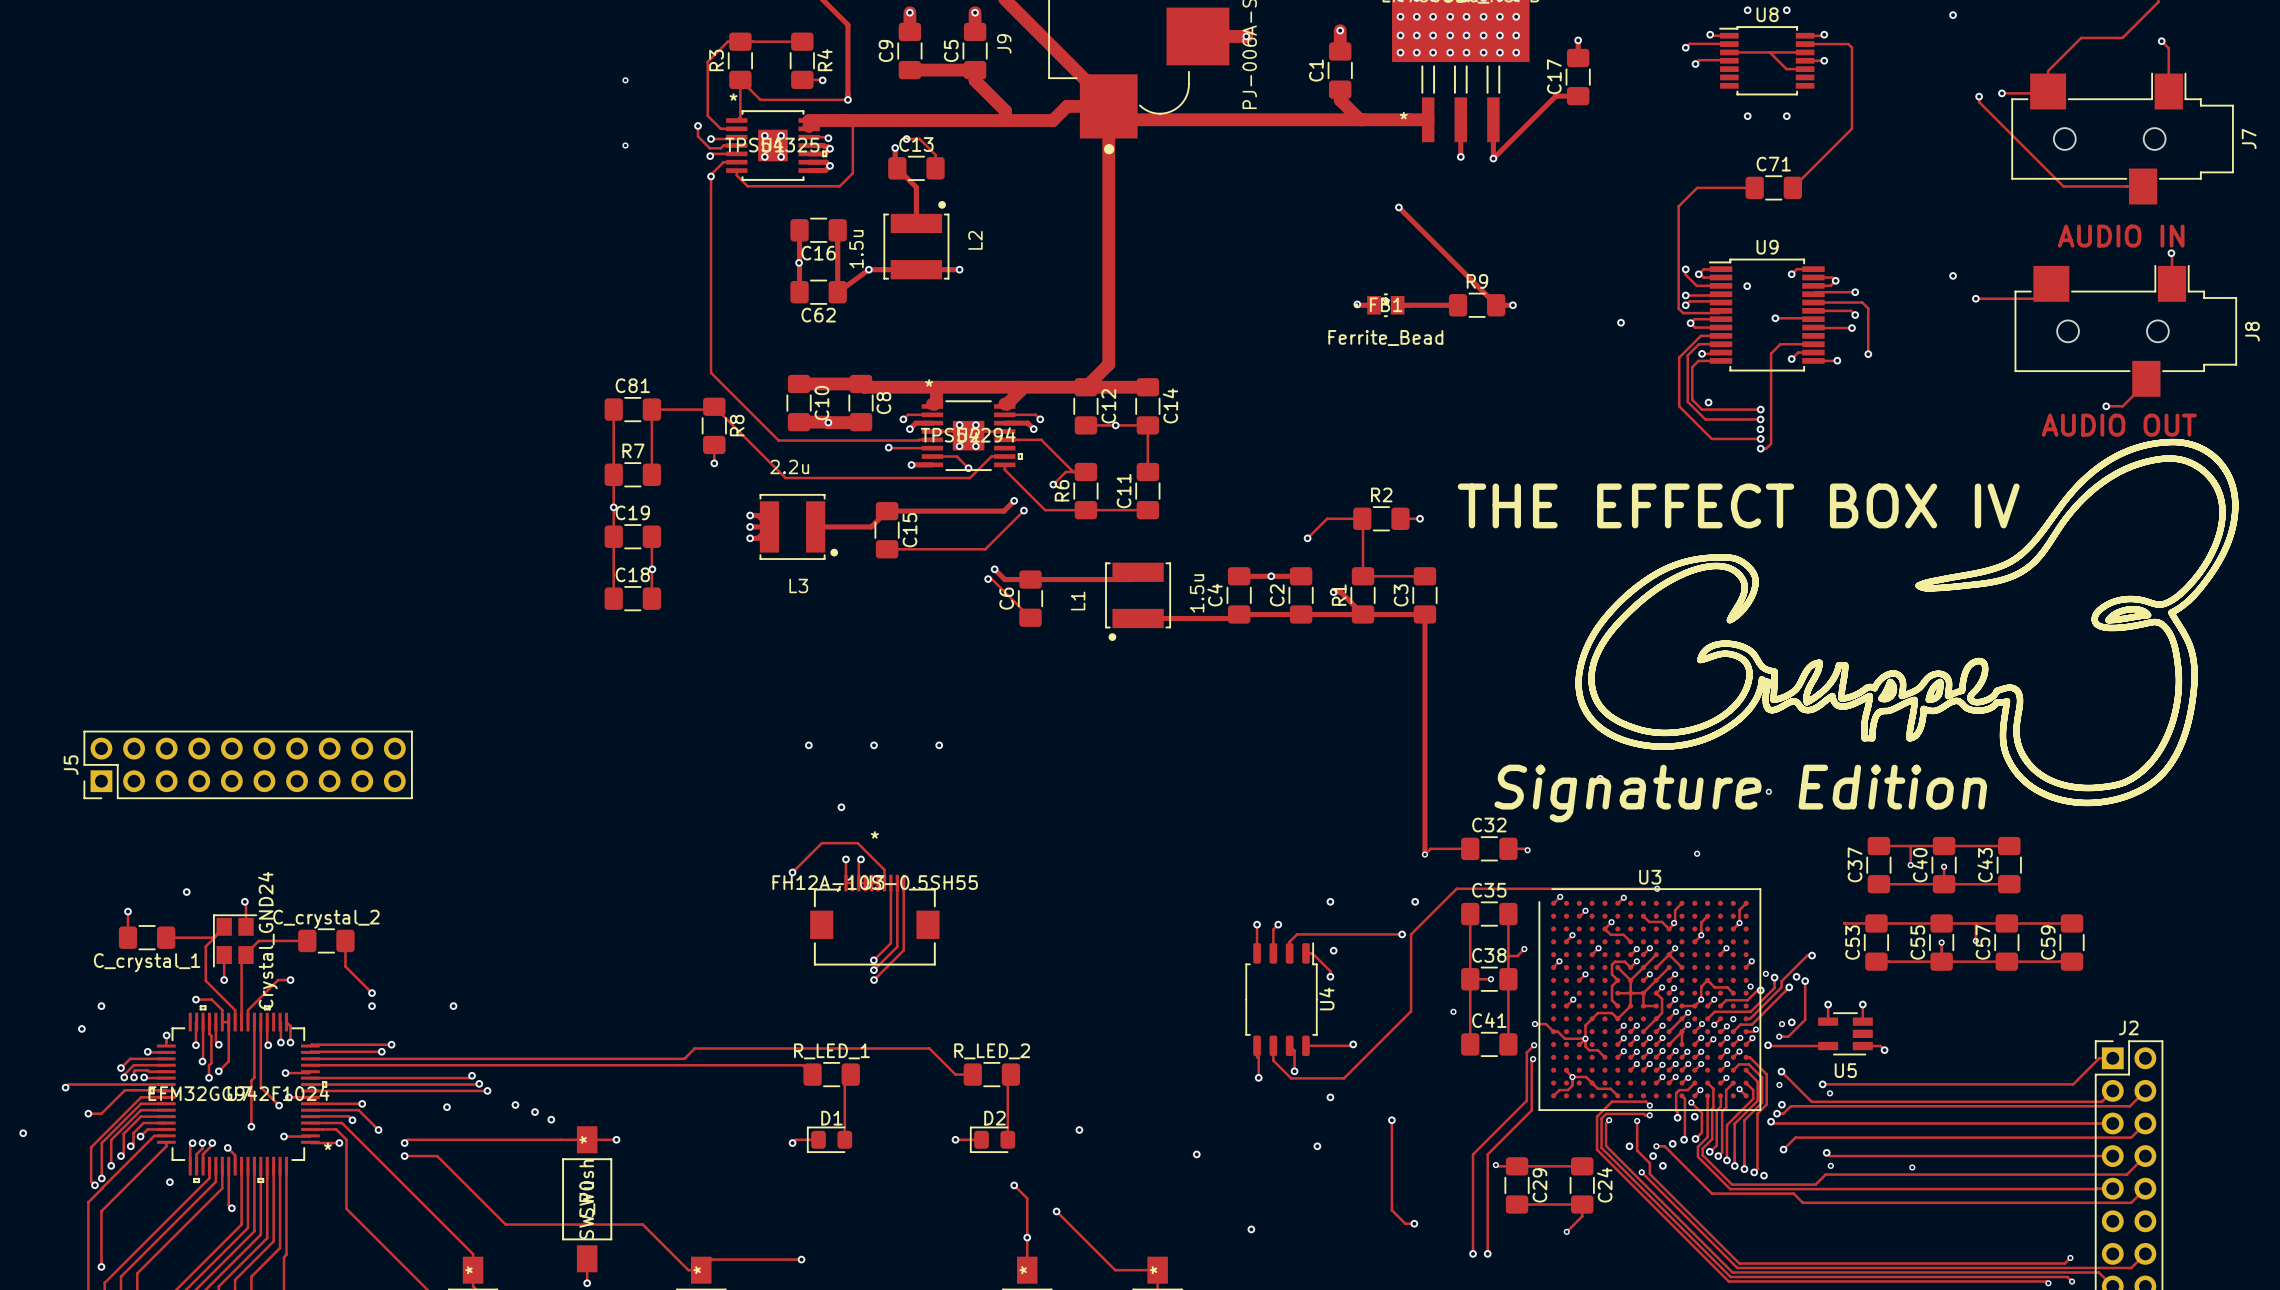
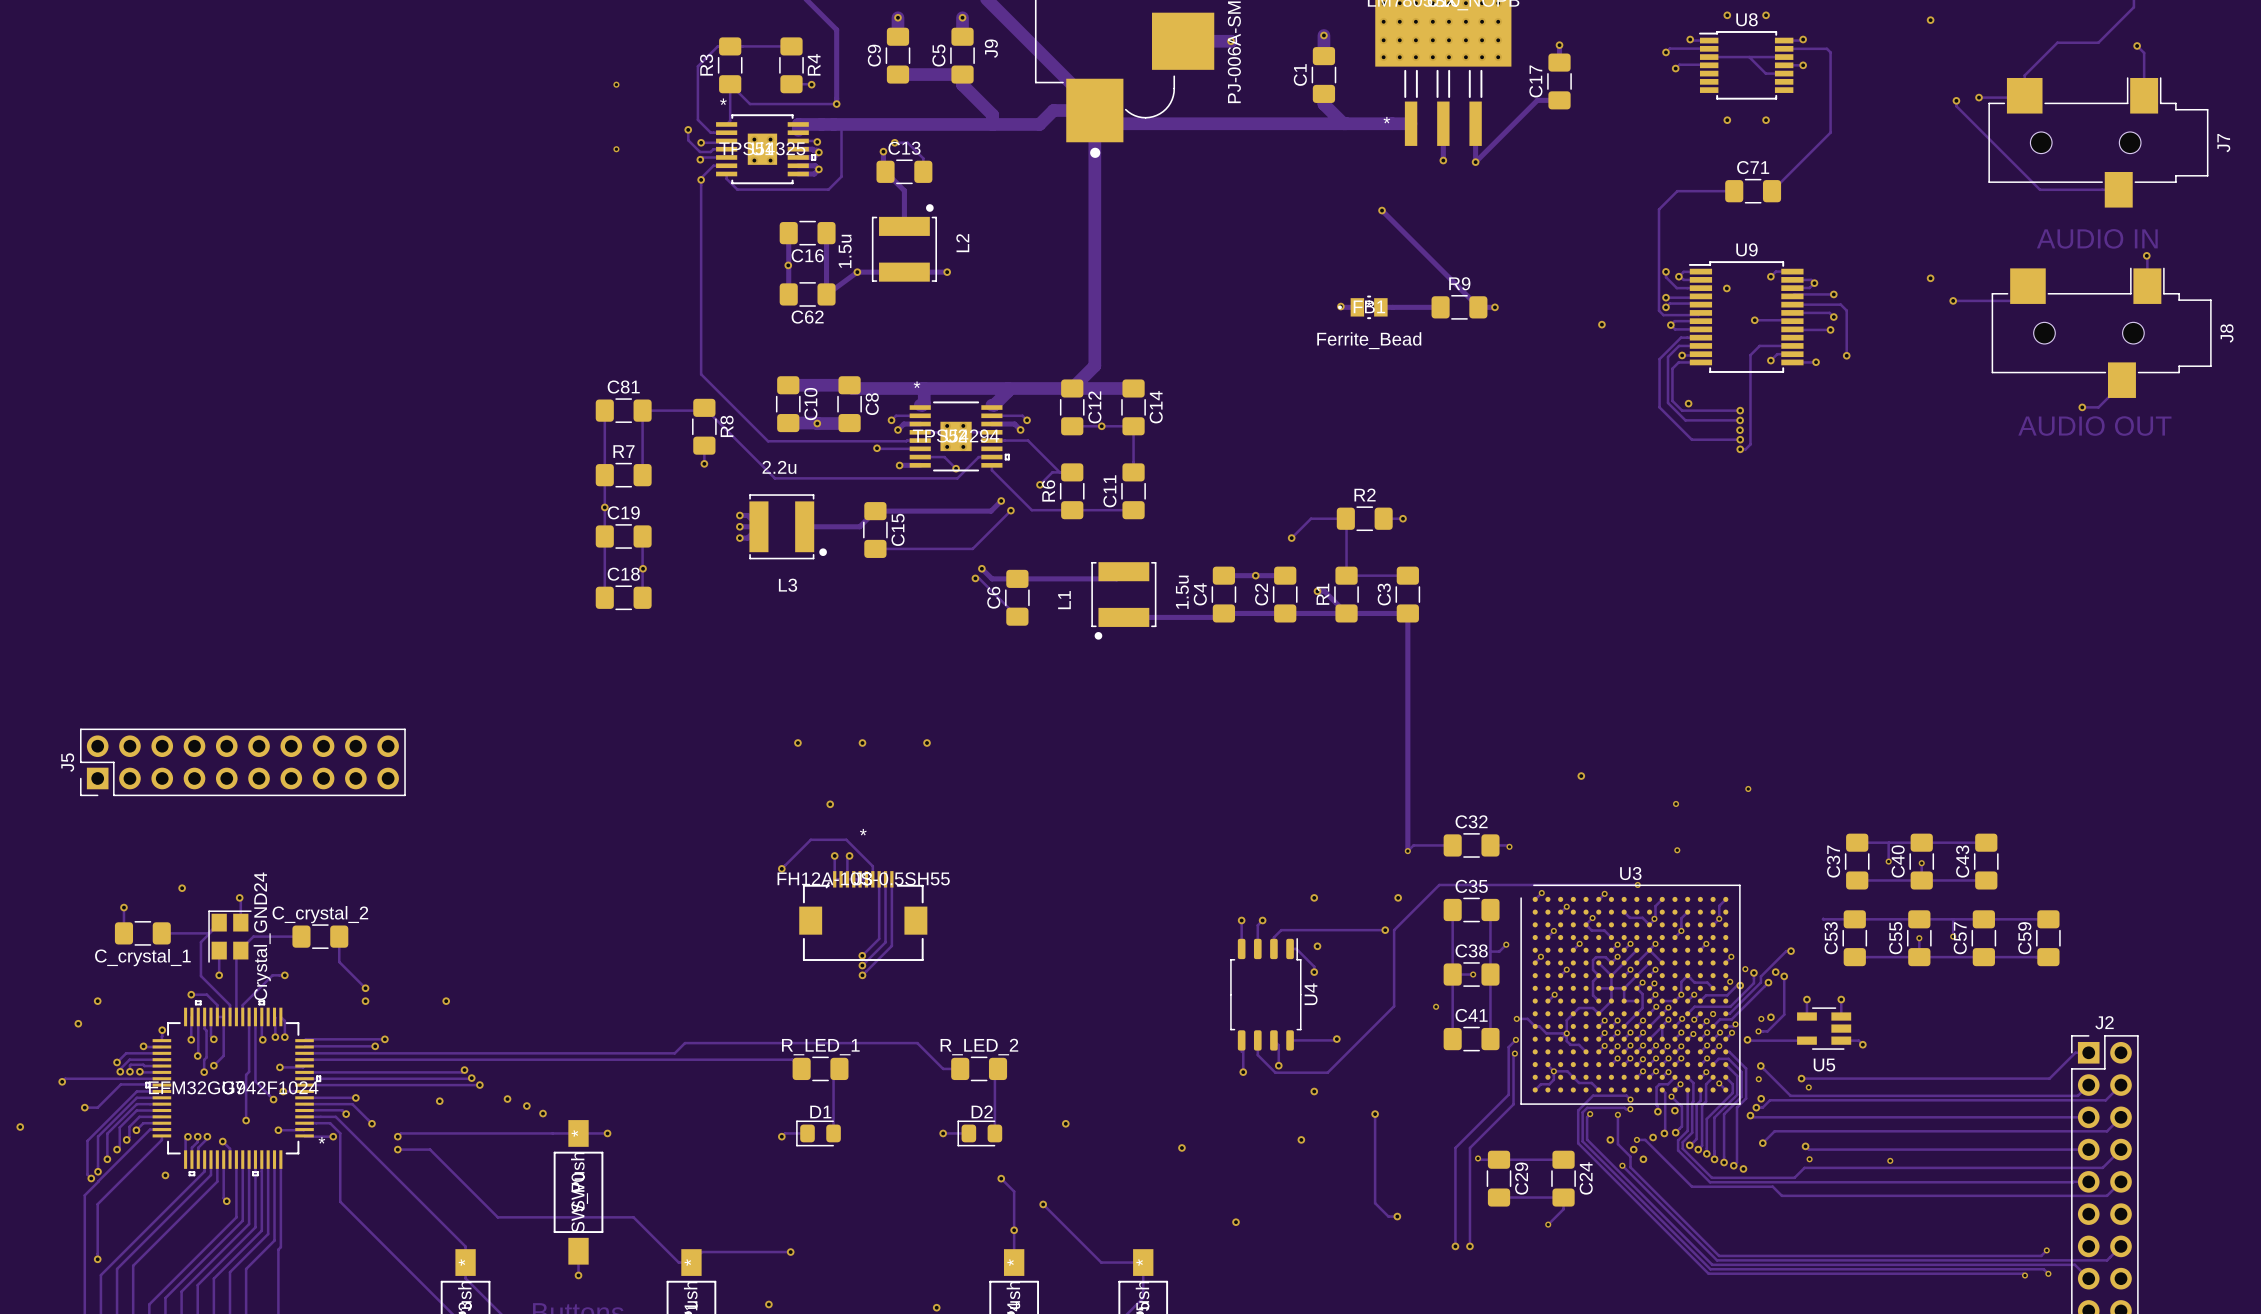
line: (2169, 442) (2150, 444) (2131, 449) (2097, 468) (2071, 493) (2031, 544) (2011, 561) (1987, 570) (1918, 585) (1929, 588) (1981, 583) (2002, 579) (2019, 572) (2038, 557) (2066, 518) (2085, 496) (2107, 479) (2131, 466) (2154, 460) (2174, 458) (2190, 462) (2205, 472) (2219, 492) (2222, 517) (2215, 546) (2198, 574) (2180, 593) (2165, 603) (2157, 604) (2134, 599) (2120, 599) (2104, 606) (2095, 616) (2096, 623) (2106, 627) (2125, 627) (2152, 622) (2160, 623) (2169, 633) (2175, 651) (2178, 691) (2169, 729) (2162, 746) (2151, 761) (2139, 773) (2126, 781) (2104, 786) (2077, 787) (2055, 782) (2036, 771) (2024, 758) (2017, 742) (2016, 727) (2020, 700) (2016, 690) (2009, 687) (1996, 690) (1991, 697) (1981, 701) (1974, 702) (1970, 699) (1984, 674) (1984, 665) (1980, 661) (1972, 663) (1967, 668) (1962, 690) (1947, 696) (1948, 680) (1943, 674) (1931, 675) (1917, 689) (1901, 696) (1902, 679) (1898, 675) (1893, 673) (1882, 677) (1874, 688) (1868, 687) (1854, 695) (1841, 698) (1845, 665) (1838, 665) (1828, 685) (1806, 702) (1807, 692) (1817, 672) (1819, 662) (1808, 668) (1793, 691) (1773, 699) (1774, 671) (1763, 667) (1753, 653) (1746, 648) (1733, 644) (1720, 643) (1706, 649) (1700, 660) (1720, 654) (1733, 655) (1745, 661) (1749, 673) (1747, 685) (1741, 697) (1732, 708) (1720, 717) (1693, 729) (1662, 732) (1636, 728) (1608, 715) (1595, 698) (1591, 677) (1596, 656) (1610, 632) (1634, 606) (1659, 587) (1685, 573) (1710, 566) (1730, 568) (1738, 574) (1743, 581) (1743, 594) (1729, 620) (1732, 618) (1749, 601) (1753, 591) (1755, 580) (1753, 573) (1748, 566) (1731, 557) (1700, 558) (1671, 566) (1643, 581) (1618, 603) (1596, 629) (1583, 656) (1578, 683) (1583, 706) (1595, 723) (1612, 735) (1636, 743) (1663, 746) (1699, 740) (1731, 725) (1753, 703) (1759, 691) (1761, 679) (1768, 681) (1765, 703) (1767, 708) (1771, 710) (1793, 701) (1803, 709) (1811, 709) (1832, 696) (1836, 704) (1845, 706) (1869, 696) (1864, 721) (1864, 738) (1872, 738) (1874, 721) (1879, 712) (1890, 710) (1913, 700) (1914, 705) (1909, 738) (1915, 736) (1919, 729) (1923, 708) (1936, 710) (1957, 700) (1968, 709) (1981, 710) (1991, 707) (1996, 702) (2007, 701) (2003, 732) (2004, 750) (2014, 769) (2030, 786) (2053, 797) (2079, 802) (2107, 801) (2134, 793) (2151, 783) (2164, 771) (2175, 756) (2183, 738) (2192, 702) (2194, 665) (2188, 642) (2171, 612) (2191, 597) (2213, 569) (2228, 541) (2234, 515) (2232, 485) (2219, 462) (2209, 453) (2198, 446) (2184, 443) (2169, 442) -> none
text: THE EFFECT BOX IV (1738, 505) -> none
line: (2131, 609) (2117, 612) (2108, 620) (2148, 615) (2141, 610) (2131, 609) -> none
line: (1890, 681) (1893, 687) (1892, 693) (1888, 698) (1881, 698) (1890, 681) -> none
line: (1940, 681) (1933, 688) (1928, 699) (1938, 695) (1940, 681) -> none
text: Signature Edition (1740, 793) -> none

